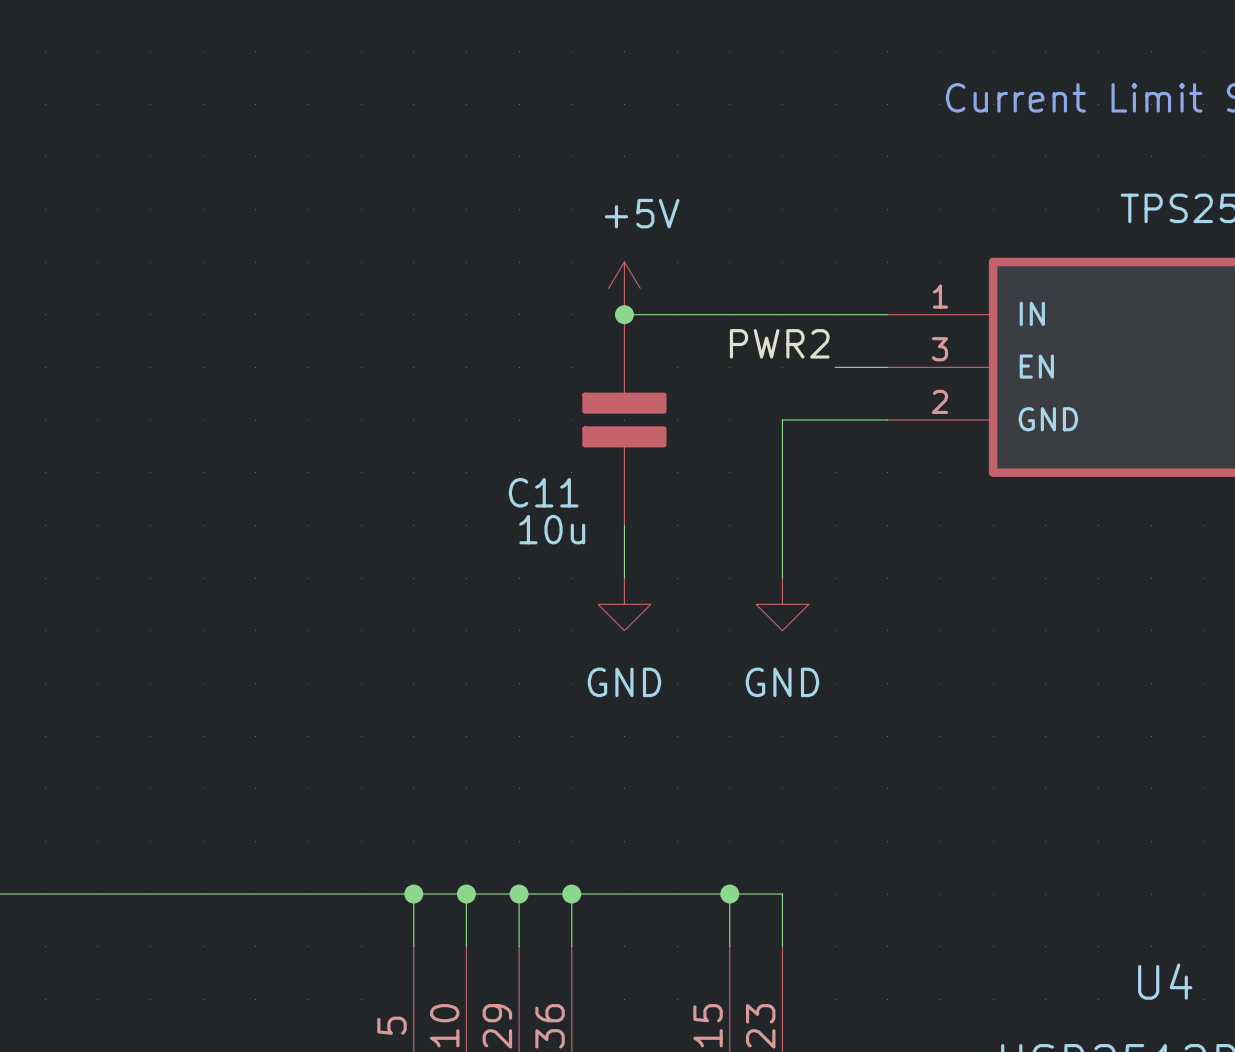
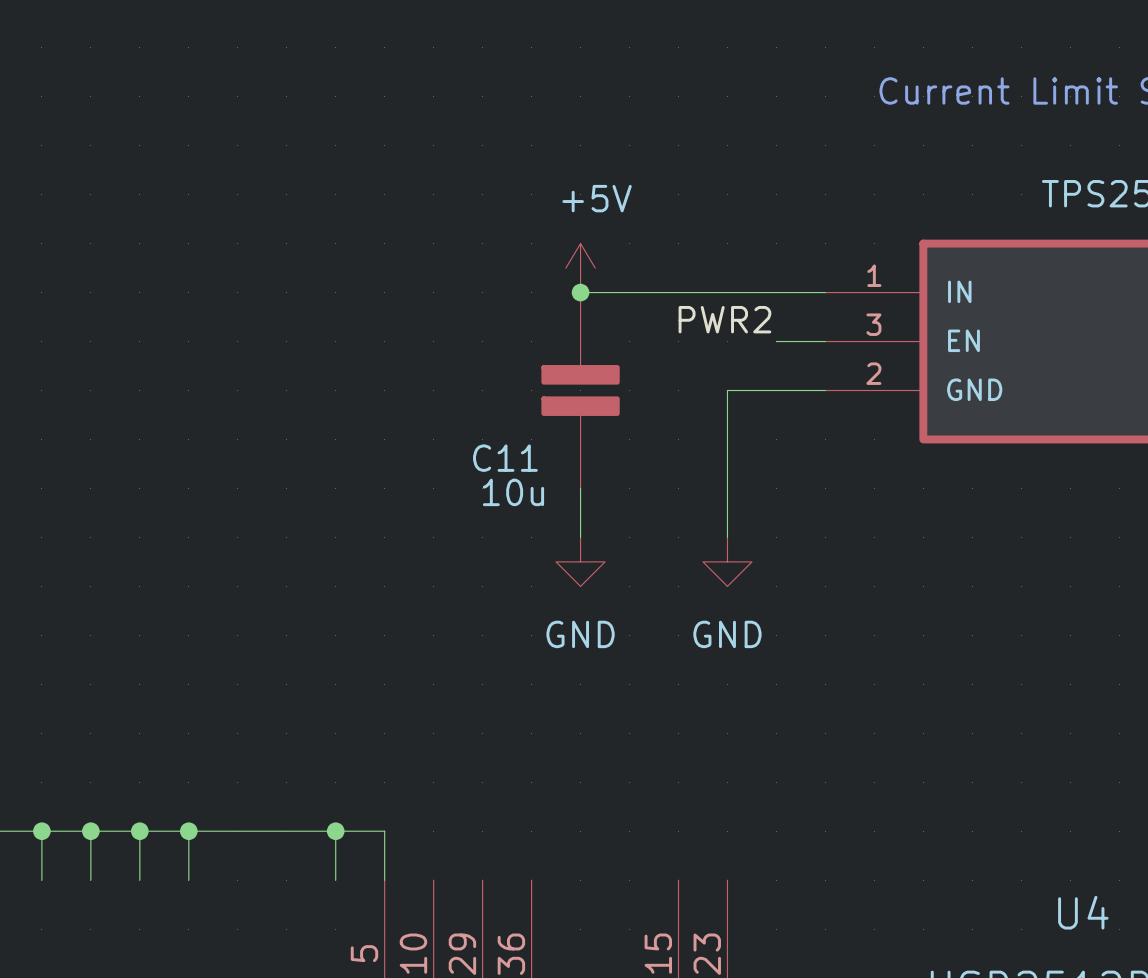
wire: none -> (41, 831) (41, 880)
junction: none -> (41, 831)
junction: none -> (90, 831)
junction: none -> (139, 831)
junction: none -> (188, 831)
junction: none -> (335, 831)
wire: (413, 894) (782, 894) (782, 946) -> none
junction: (413, 894) -> none
wire: (466, 894) (466, 946) -> (90, 831) (90, 880)
junction: (466, 894) -> none
wire: (519, 894) (519, 946) -> (139, 831) (139, 880)
junction: (519, 894) -> none
wire: (571, 894) (571, 946) -> (188, 831) (188, 880)
junction: (571, 894) -> none
wire: (729, 894) (729, 946) -> (335, 831) (335, 880)
junction: (729, 894) -> none

